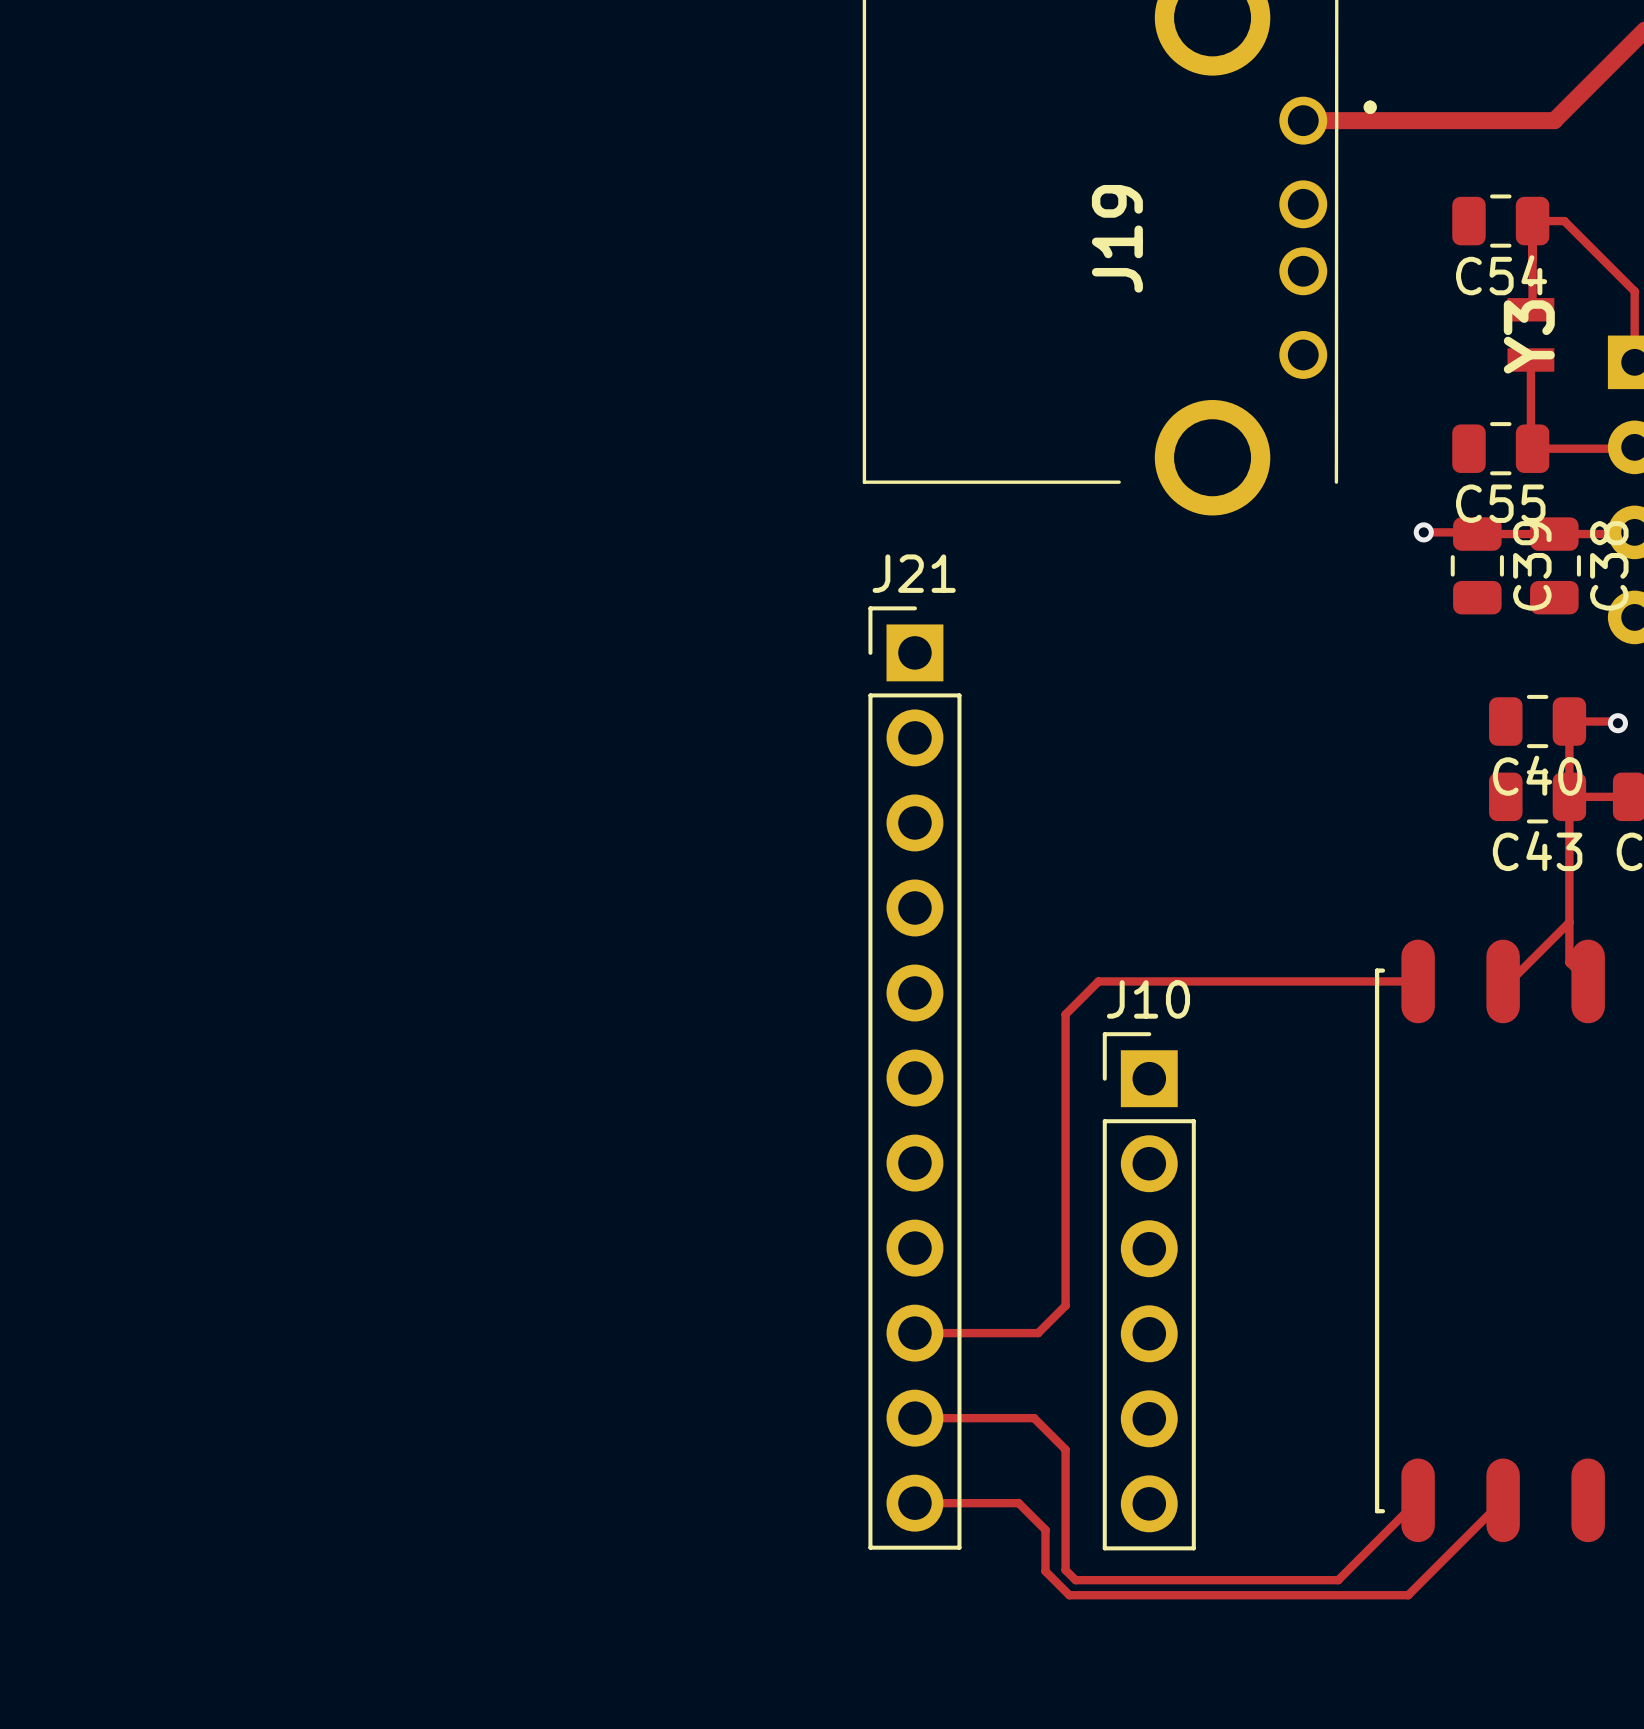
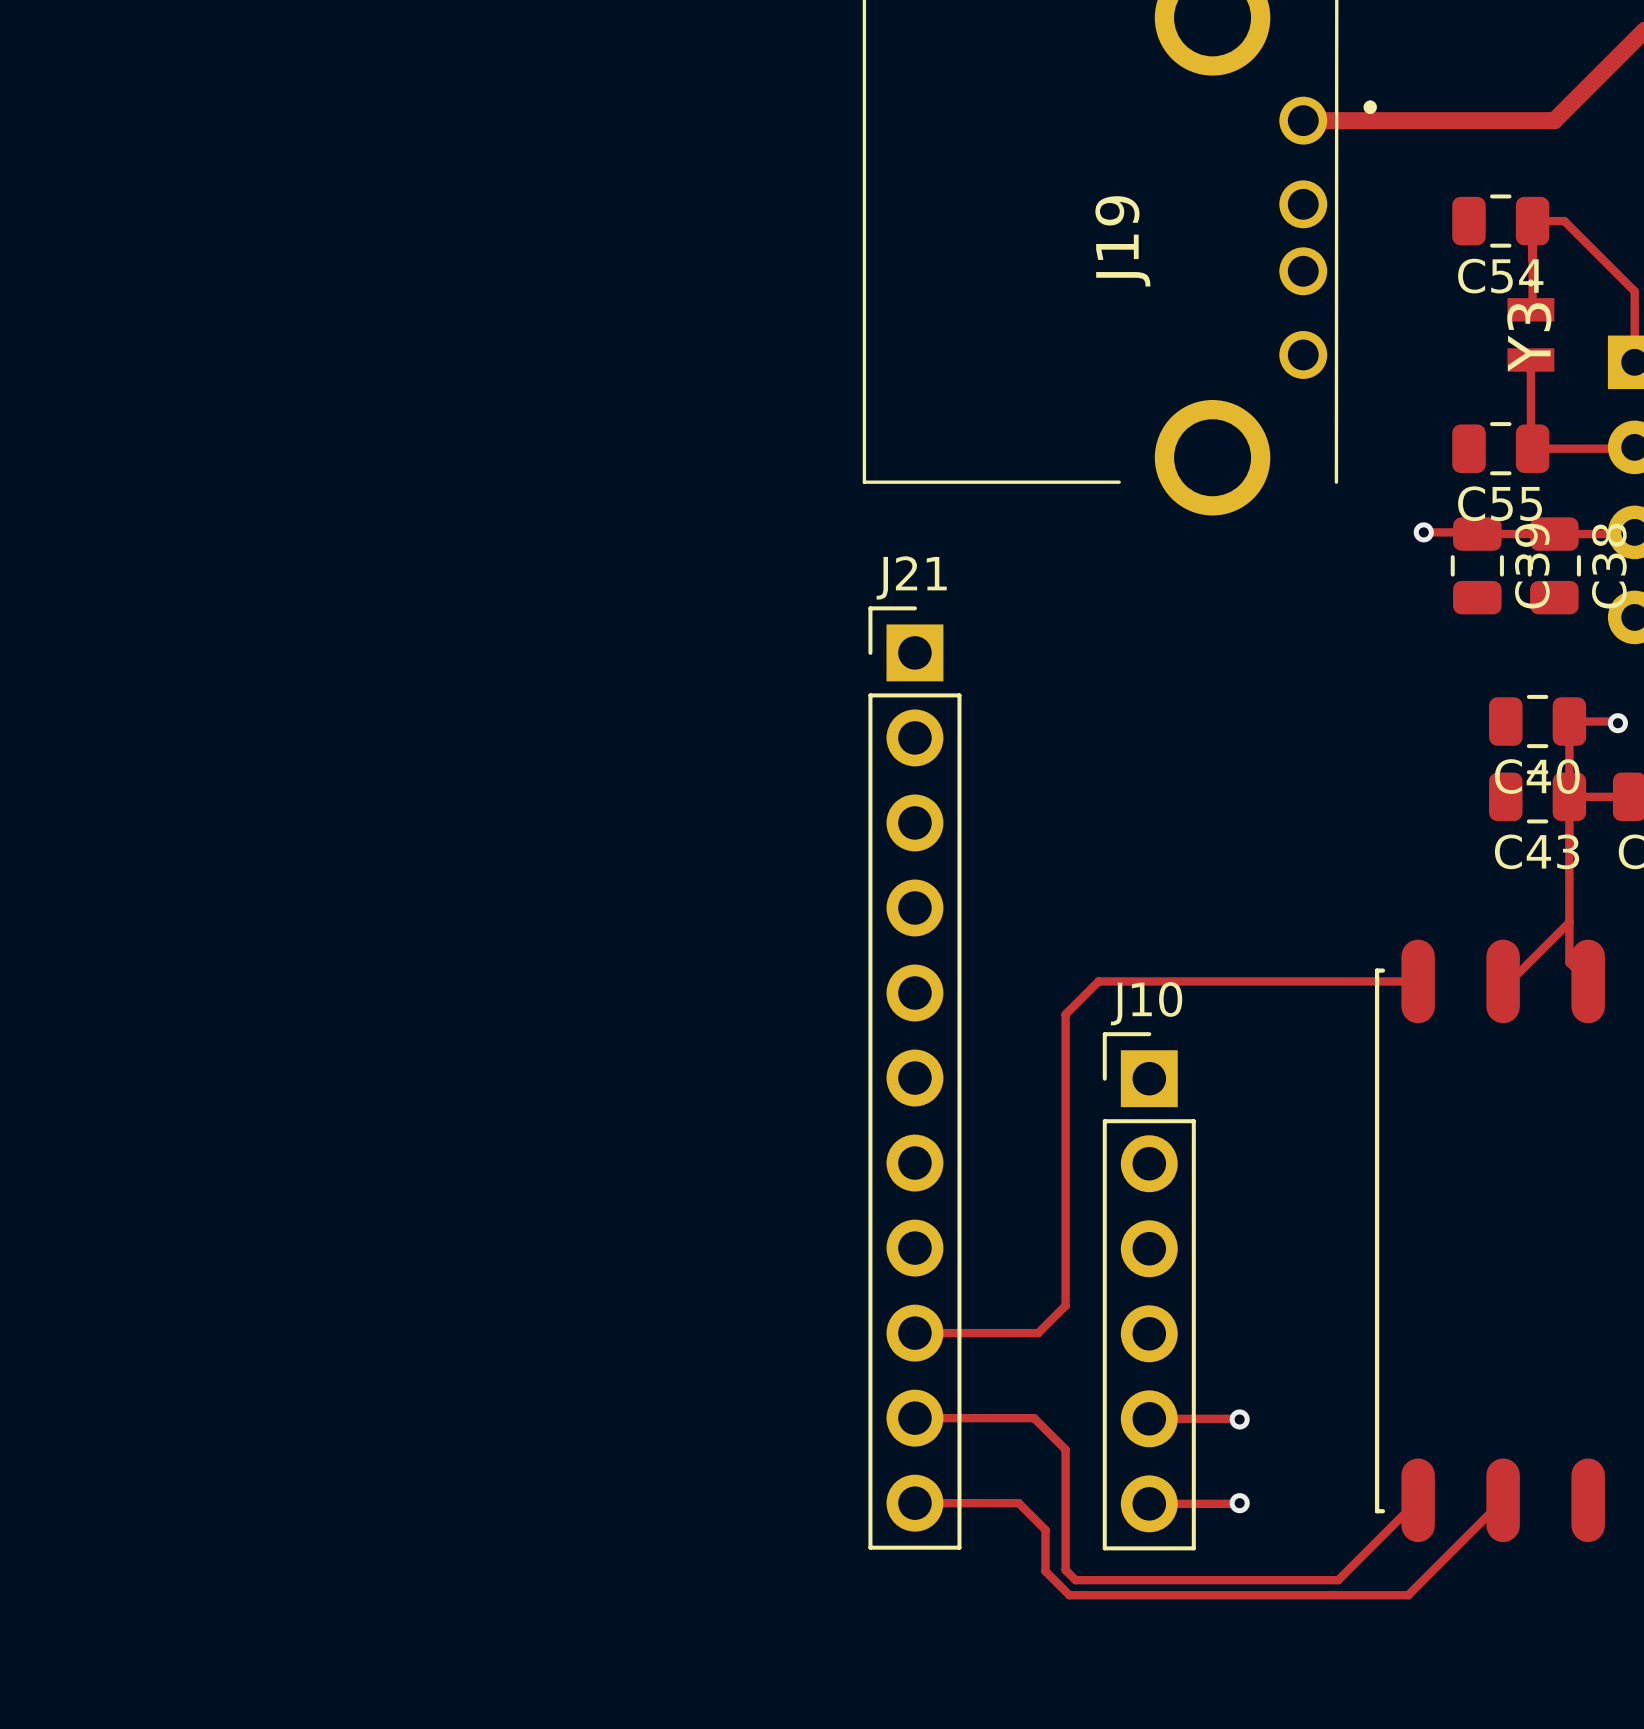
track: none -> (1149, 1418) (1239, 1419)
via: none -> (1239, 1419)
track: none -> (1239, 1503) (1149, 1503)
via: none -> (1239, 1503)

